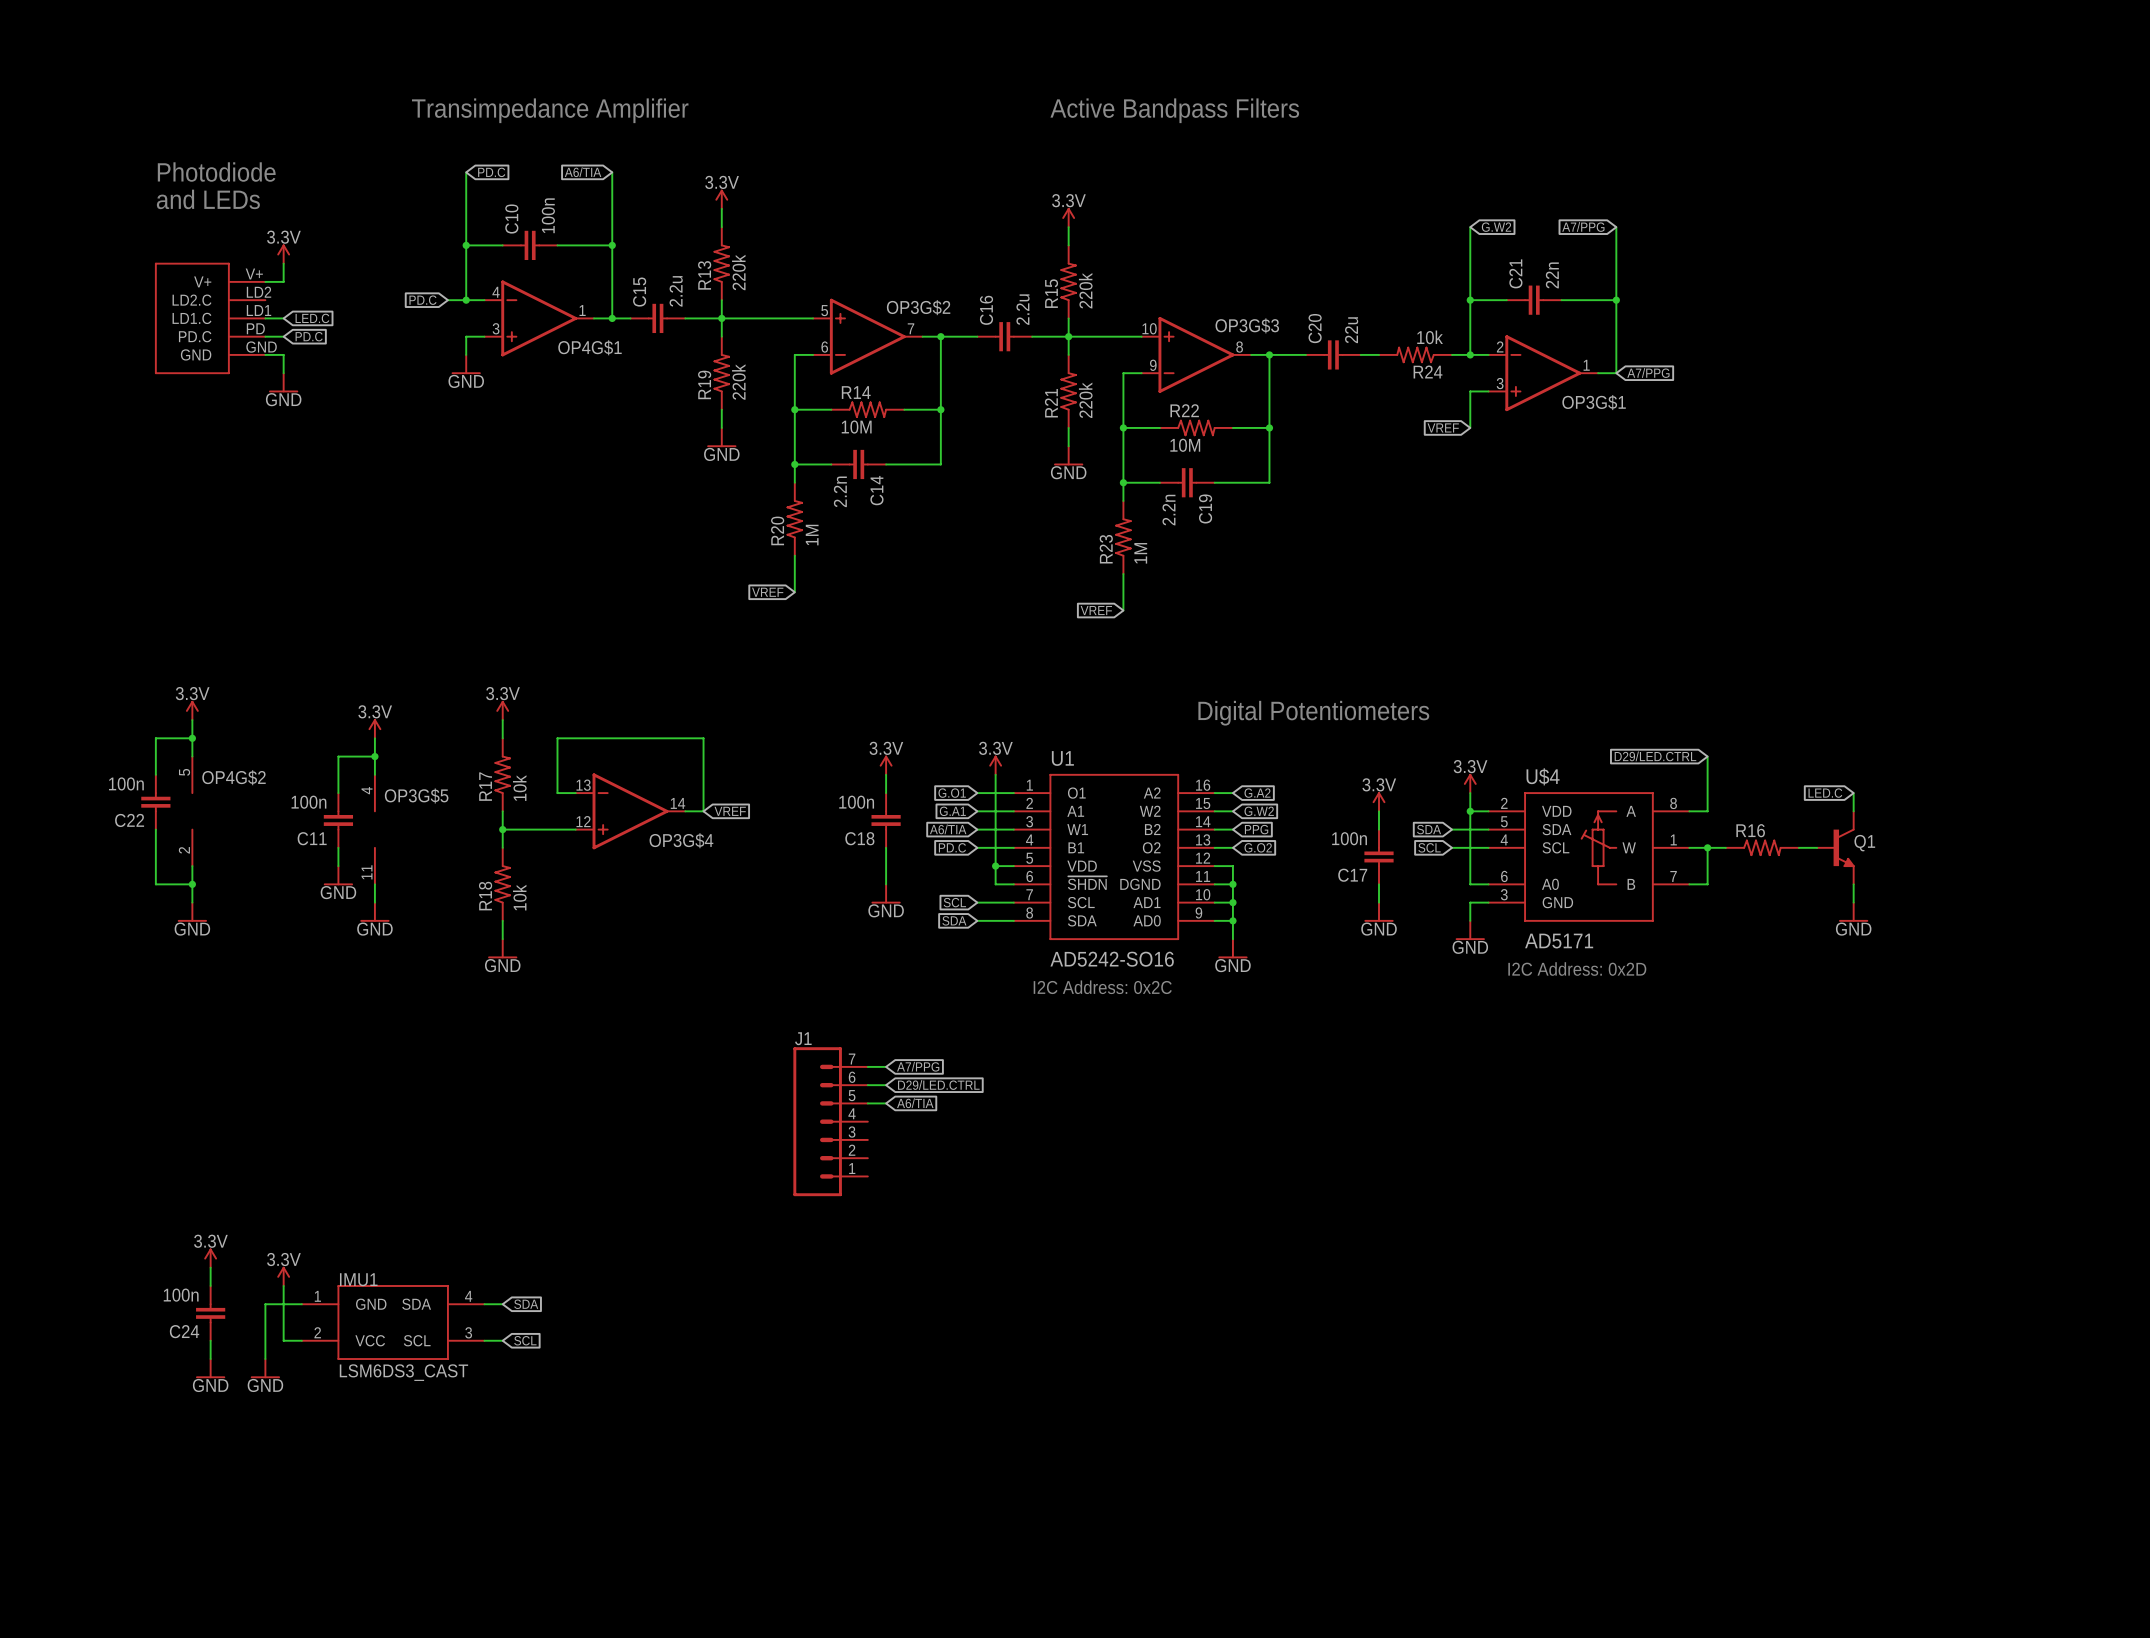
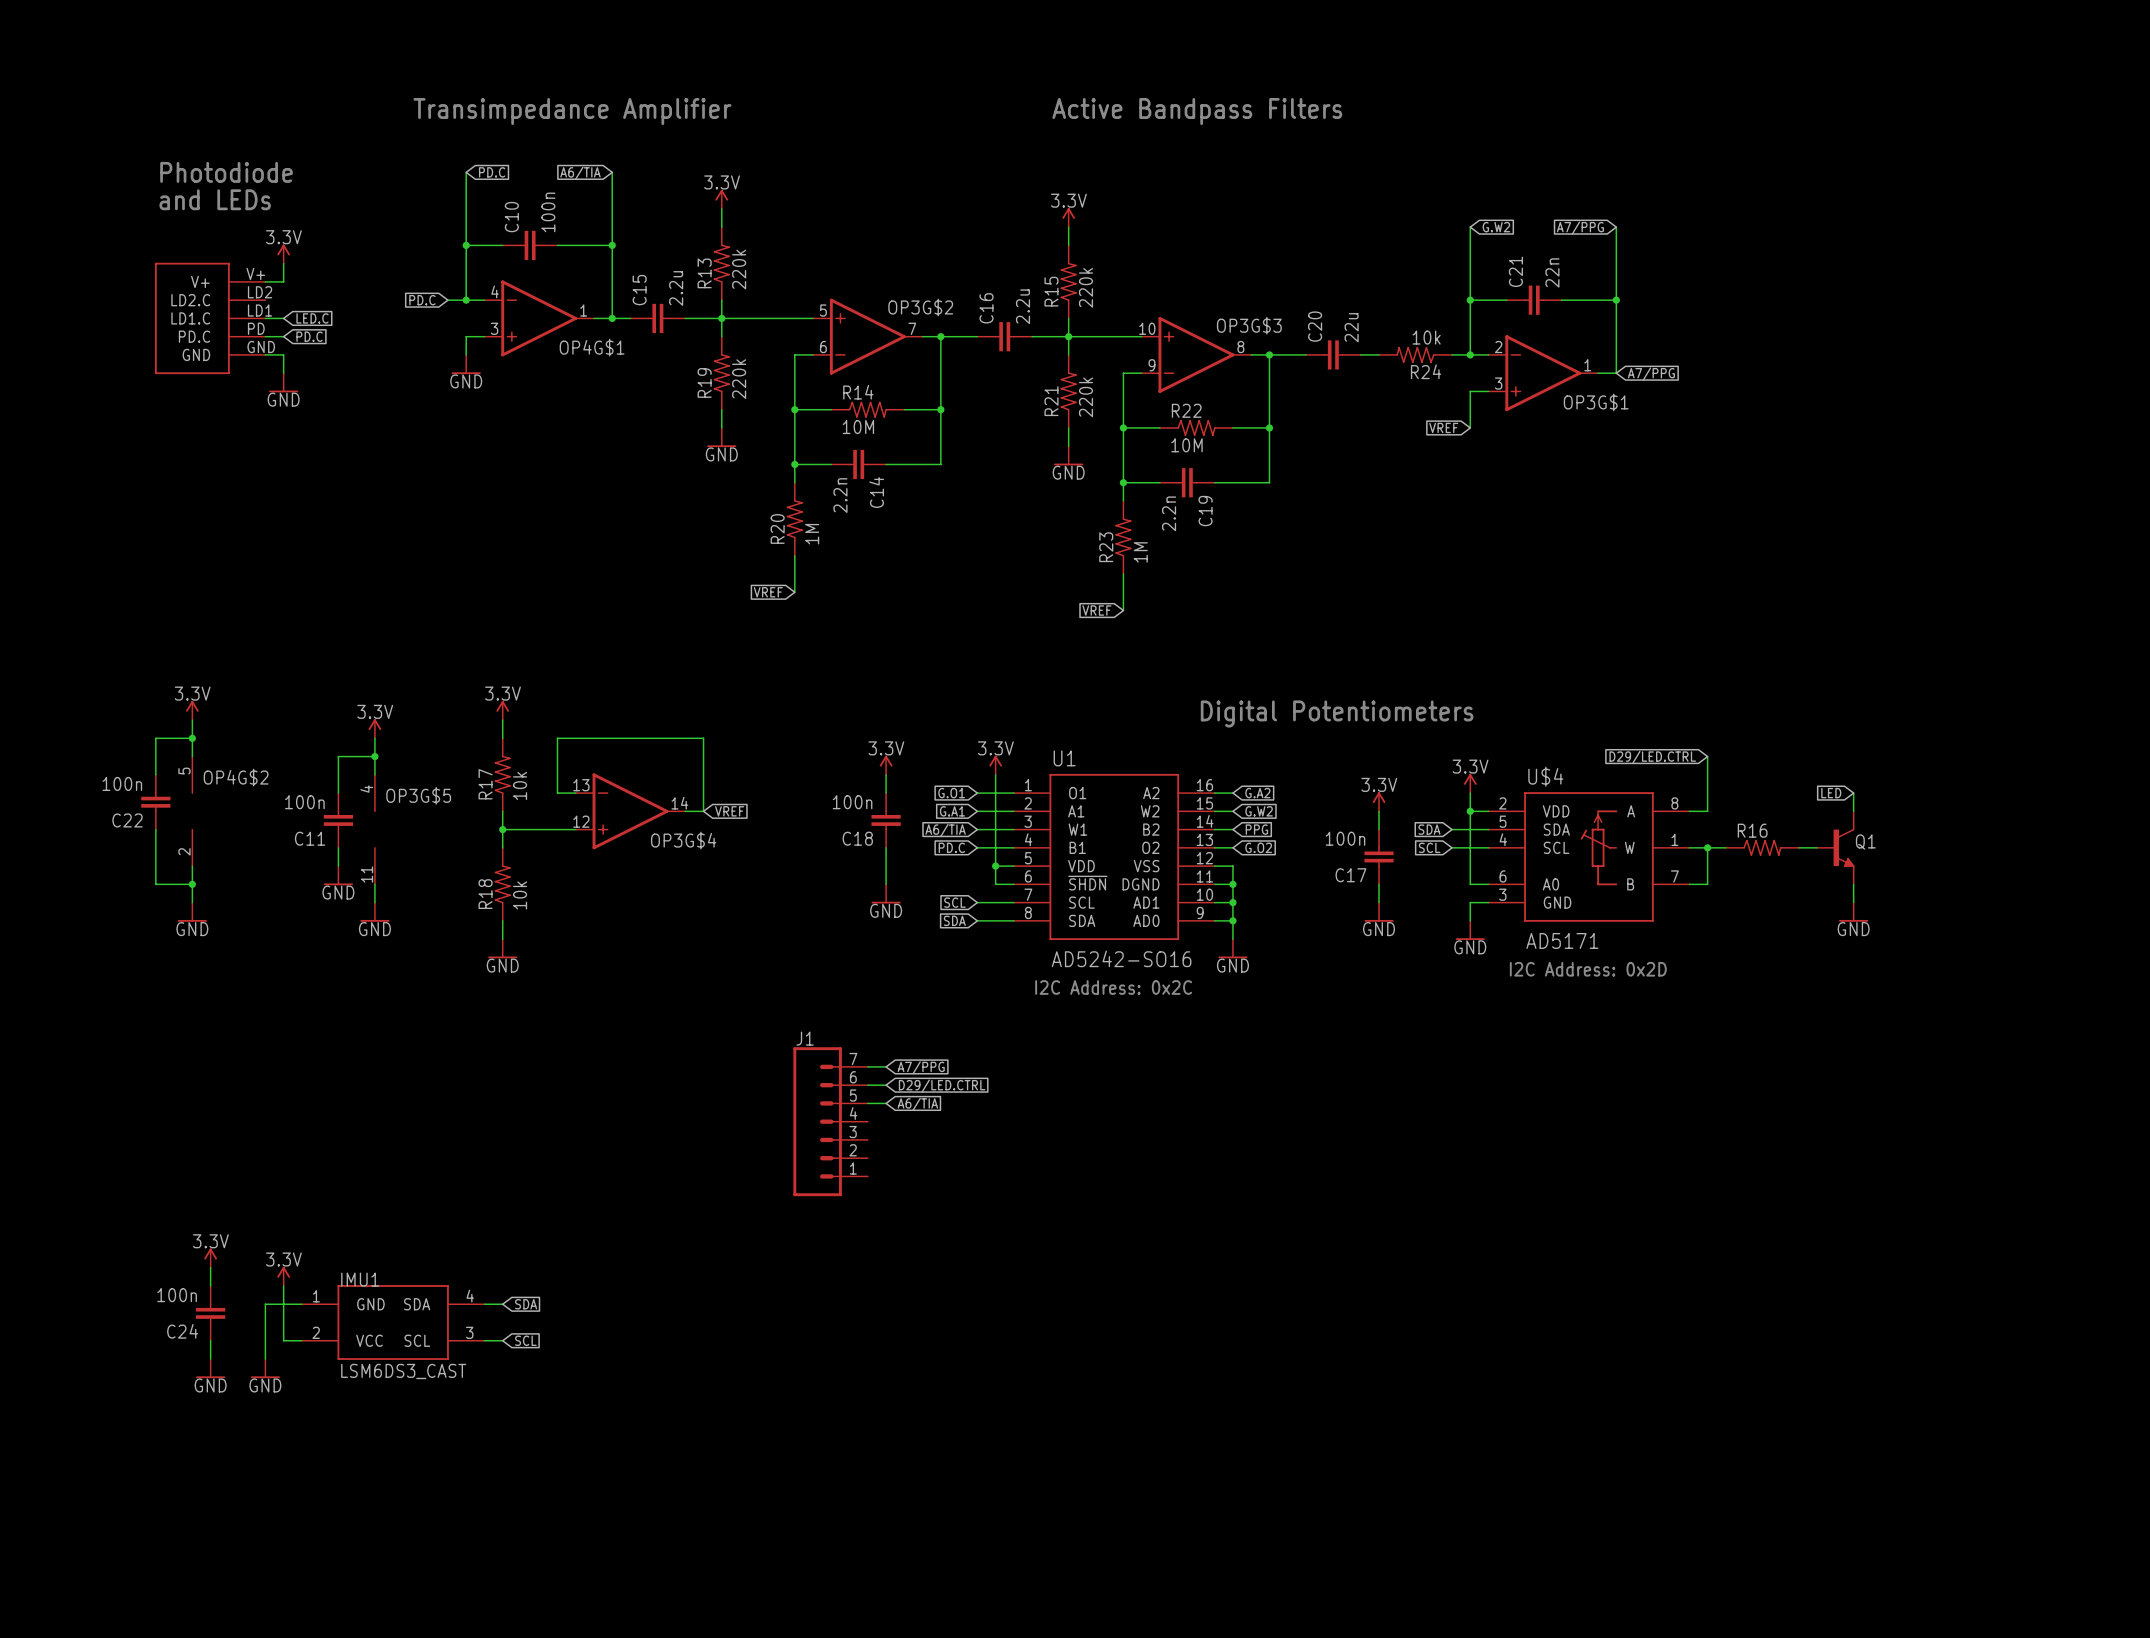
global label: LED.C (1825, 793) -> LED (1831, 793)

